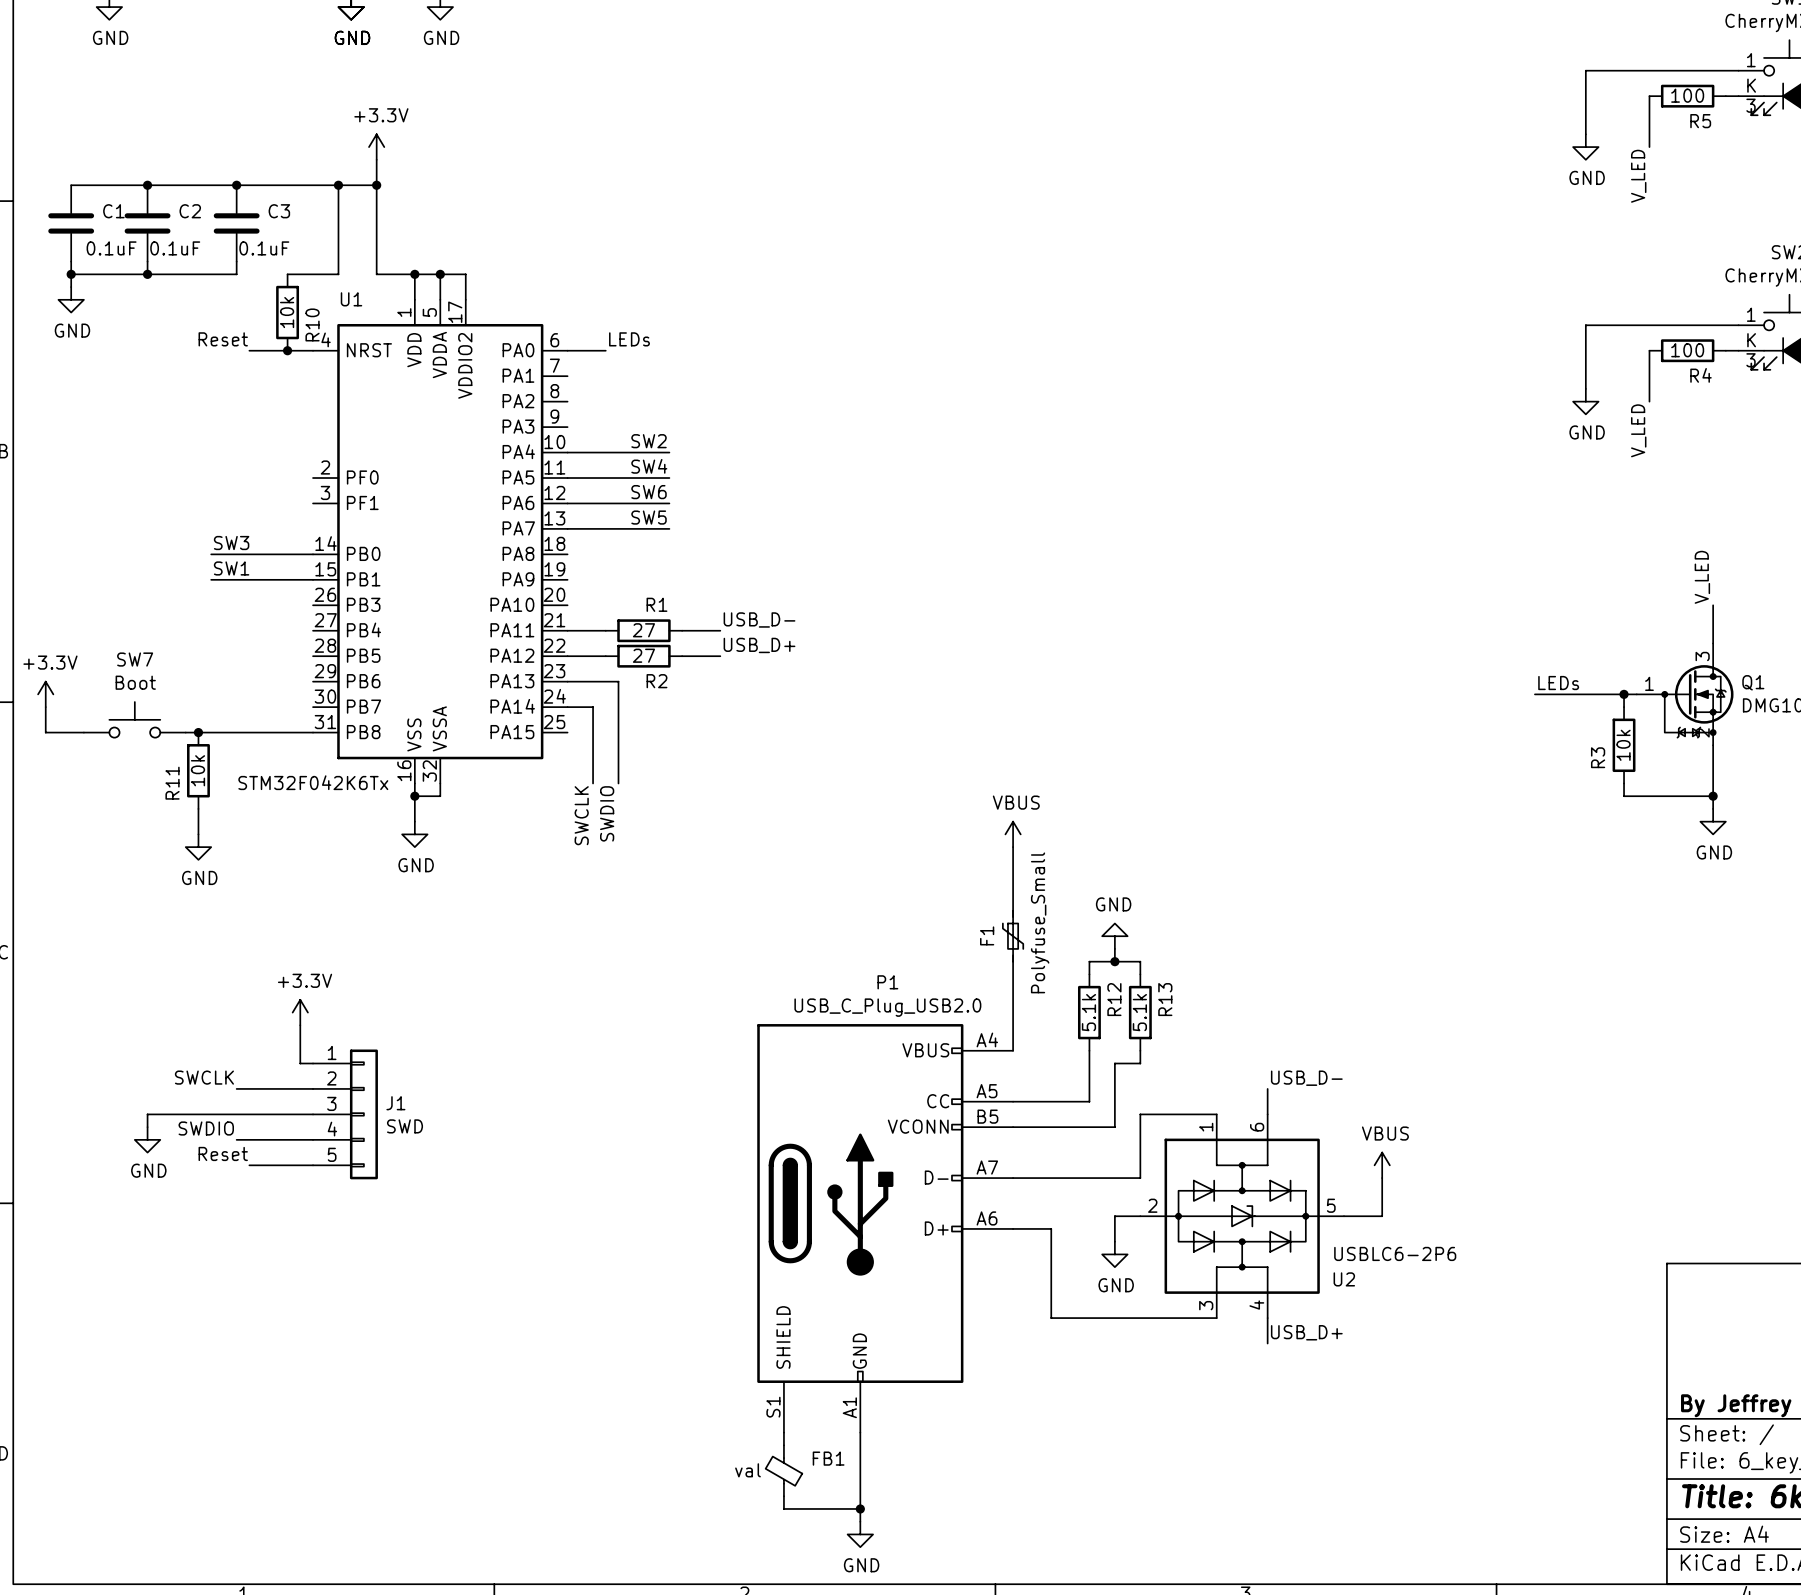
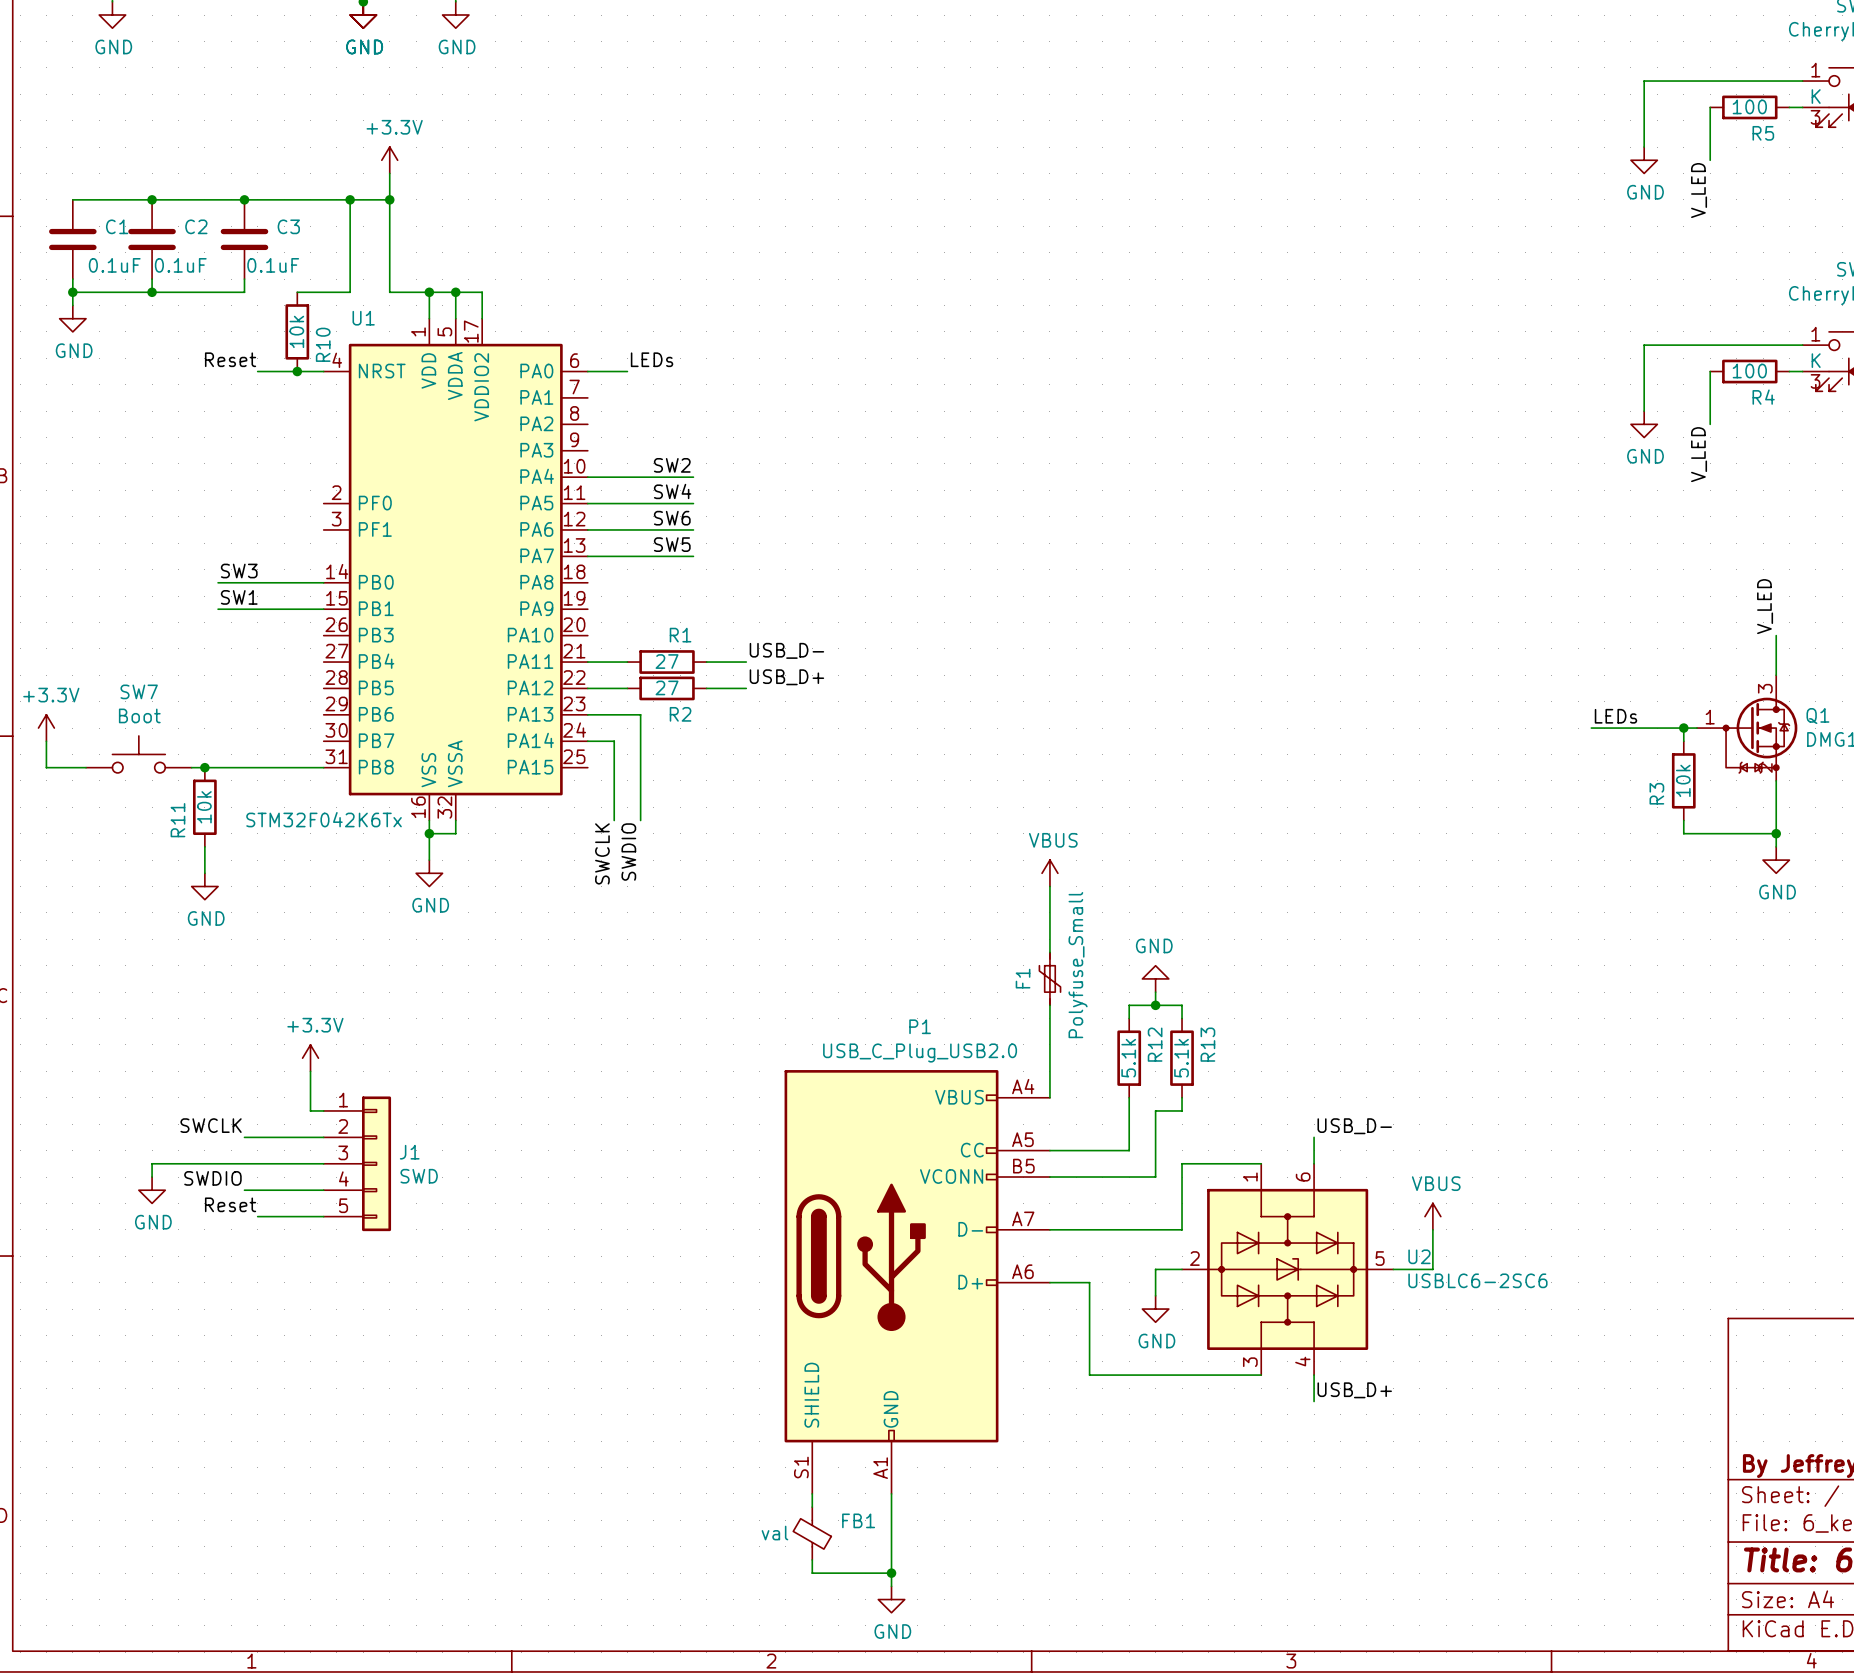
U2 value: USBLC6-2P6 (1395, 1253) -> USBLC6-2SC6 (1477, 1280)
U2 name position: U2 (1344, 1279) -> U2 (1419, 1256)

